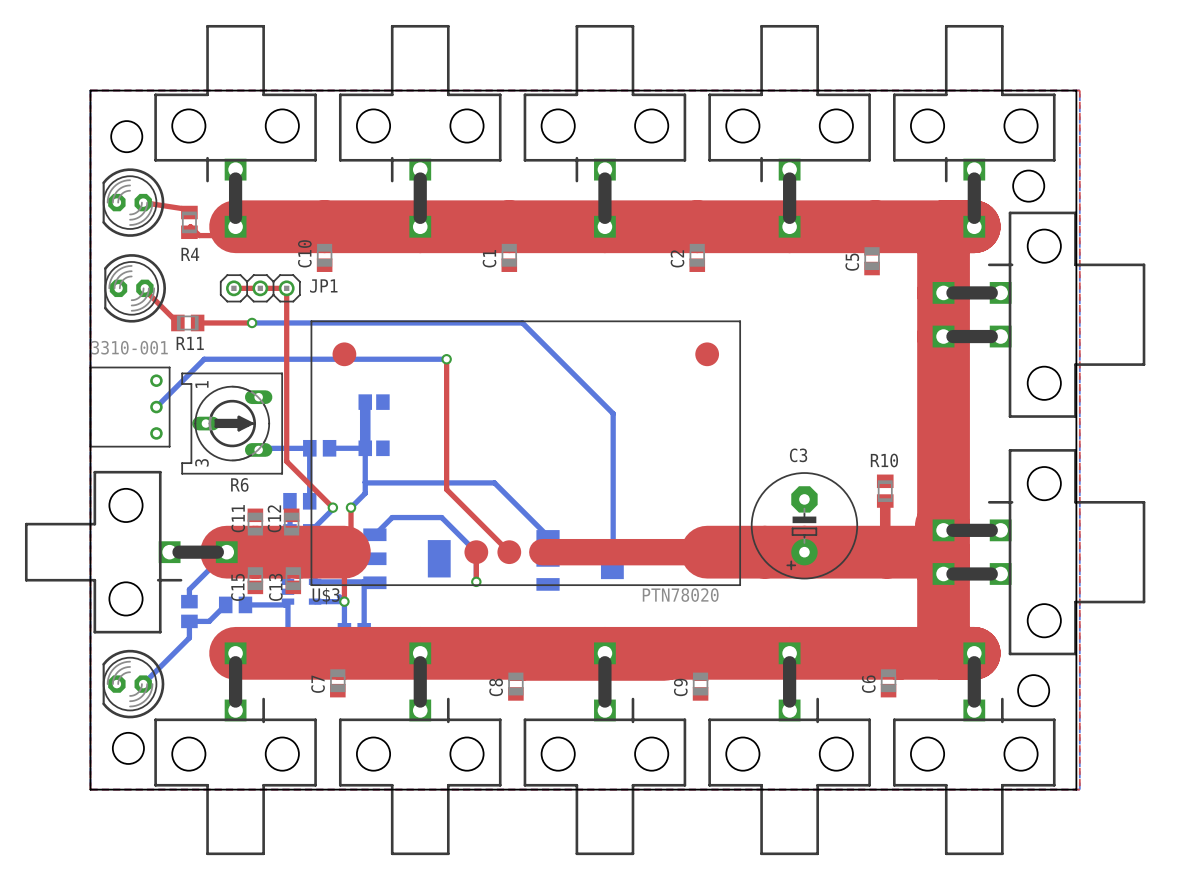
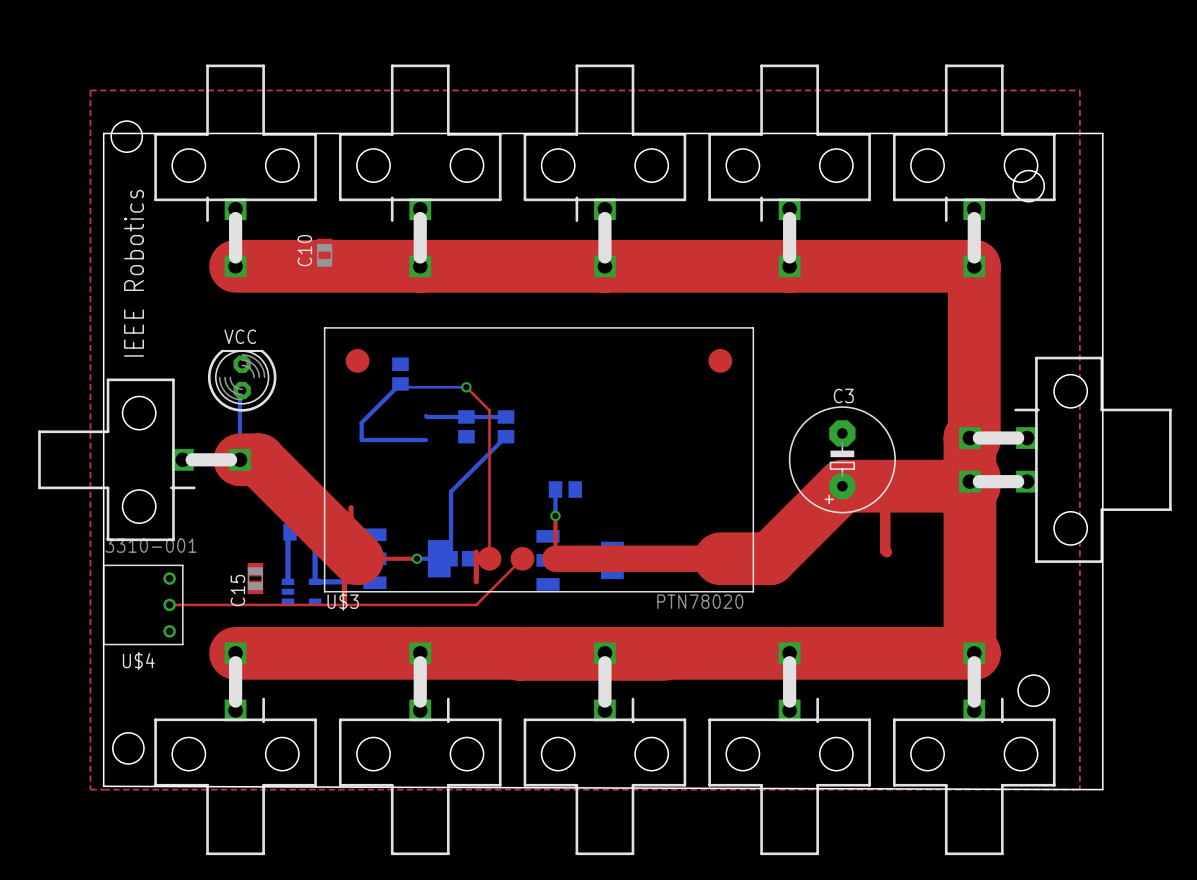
board edge: (90, 90) (1076, 90) (1076, 789) (90, 789) (90, 90) -> (103, 133) (103, 786) (1102, 789) (1102, 133) (103, 133)
part position: (235, 131) -> (235, 170)
part position: (420, 131) -> (420, 170)
part position: (604, 131) -> (604, 170)
part position: (789, 131) -> (789, 170)
part position: (974, 131) -> (974, 170)
part: (133, 202) -> none
top track: (143, 202) (186, 209) (189, 212) -> none
R4: (189, 222) -> none
top track: (943, 226) (943, 653) -> none
top track: (974, 226) (235, 226) (242, 235) (199, 235) (190, 226) (189, 232) -> none
C1: (509, 255) -> none
C2: (697, 255) -> none
C5: (872, 258) -> none
top track: none -> (235, 266) (974, 266) (974, 440)
text: none -> IEEE Robotics (134, 273)
part: (135, 288) -> none
top track: (144, 288) (177, 322) -> none
top track: (233, 288) (286, 288) (286, 461) (332, 507) -> none
JP1: (260, 288) -> none
part: (1038, 314) -> none
R11: (187, 322) -> none
top track: (197, 322) (252, 322) -> none
bottom track: (252, 322) (522, 322) (613, 413) (613, 559) (548, 560) -> none
via: (252, 322) -> none
top track: (446, 359) (446, 489) (509, 552) -> none
bottom track: (446, 359) (204, 359) (156, 407) -> none
via position: (446, 359) -> (466, 387)
part: none -> (400, 374)
VCC: none -> (242, 380)
top track: none -> (466, 387) (489, 410) (489, 558)
bottom track: none -> (466, 387) (403, 387) (400, 383) (361, 422) (361, 440) (426, 440)
bottom track: none -> (242, 390) (239, 390) (239, 459)
bottom track: (365, 402) (365, 448) -> none
part: (374, 402) -> none
part: (130, 407) -> none
bottom track: none -> (426, 416) (506, 416)
R6: (232, 423) -> none
part: none -> (466, 426)
part: none -> (506, 426)
bottom track: none -> (506, 436) (451, 491) (451, 558) (416, 558)
top track: none -> (974, 438) (969, 438) (969, 648) (974, 653)
part: (319, 448) -> none
bottom track: (329, 448) (365, 448) -> none
bottom track: (365, 448) (365, 493) (351, 507) -> none
part: (374, 448) -> none
bottom track: (258, 449) (260, 448) (309, 448) (309, 501) -> none
U$3 position: (525, 453) -> (538, 459)
C3 name position: C3 (798, 455) -> C3 (843, 395)
top track: none -> (239, 459) (258, 459) (357, 558) (416, 558)
part: none -> (1065, 459)
bottom track: (365, 482) (494, 482) (548, 536) -> none
top track: none -> (974, 486) (842, 486) (769, 558) (555, 558) (555, 515)
bottom track: none -> (555, 489) (555, 515)
part: none -> (565, 489)
R10: (885, 491) -> none
part: (299, 501) -> none
bottom track: (332, 507) (309, 532) (309, 529) -> none
via: (332, 507) -> none
via: (351, 507) -> none
via: none -> (555, 515)
C11: (255, 524) -> none
C12: (291, 524) -> none
C3 position: (804, 525) -> (842, 459)
bottom track: (375, 534) (392, 517) (441, 517) (476, 552) (476, 581) -> none
top track: (943, 550) (941, 552) (542, 552) -> none
part position: (131, 552) -> (144, 459)
top track: (226, 552) (344, 552) -> none
bottom track: (226, 552) (189, 589) (189, 601) -> none
part: (1038, 552) -> none
via: none -> (416, 558)
part: none -> (459, 558)
top track: none -> (522, 558) (476, 604) (169, 604)
C13: (293, 578) -> none
bottom track: (364, 581) (364, 631) -> none
via: (476, 581) -> none
bottom track: (339, 596) (344, 601) (344, 631) -> none
bottom track: (315, 601) (344, 601) -> none
via: (344, 601) -> none
U$4: none -> (143, 604)
bottom track: (225, 604) (209, 621) (189, 621) (189, 637) (143, 684) -> none
part: (235, 604) -> none
bottom track: (245, 604) (284, 604) (287, 601) (287, 640) (291, 644) -> none
part: (189, 611) -> none
part: (354, 631) -> none
C7: (337, 680) -> none
C6: (888, 680) -> none
part: (133, 684) -> none
C8: (515, 684) -> none
C9: (700, 684) -> none

